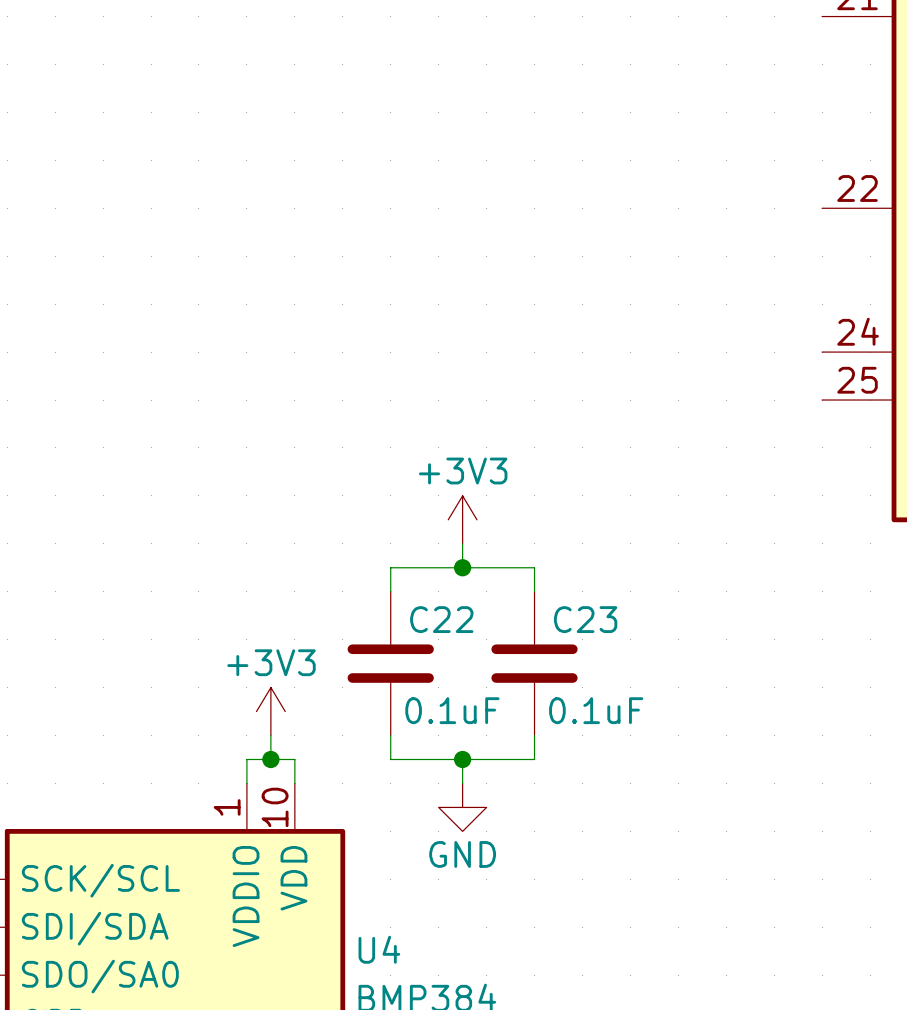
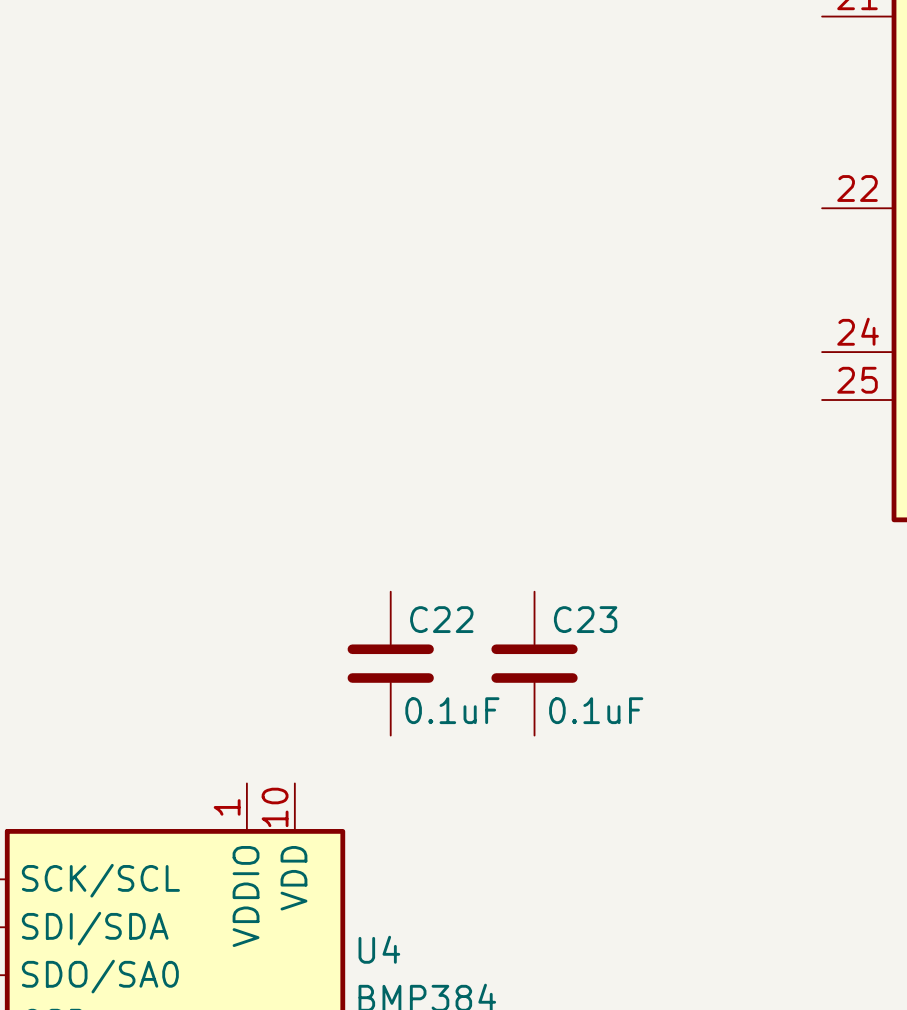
power symbol: +3V3 (462, 519) -> none
wire: (462, 543) (462, 567) -> none
junction: (462, 567) -> none
wire: (390, 591) (390, 567) (534, 567) (534, 591) -> none
power symbol: +3V3 (270, 711) -> none
wire: (270, 735) (270, 759) -> none
wire: (390, 735) (390, 759) (534, 759) (534, 735) -> none
junction: (270, 759) -> none
wire: (462, 759) (462, 783) -> none
junction: (462, 759) -> none
wire: (246, 783) (246, 759) (294, 759) (294, 783) -> none
power symbol: GND (462, 807) -> none

